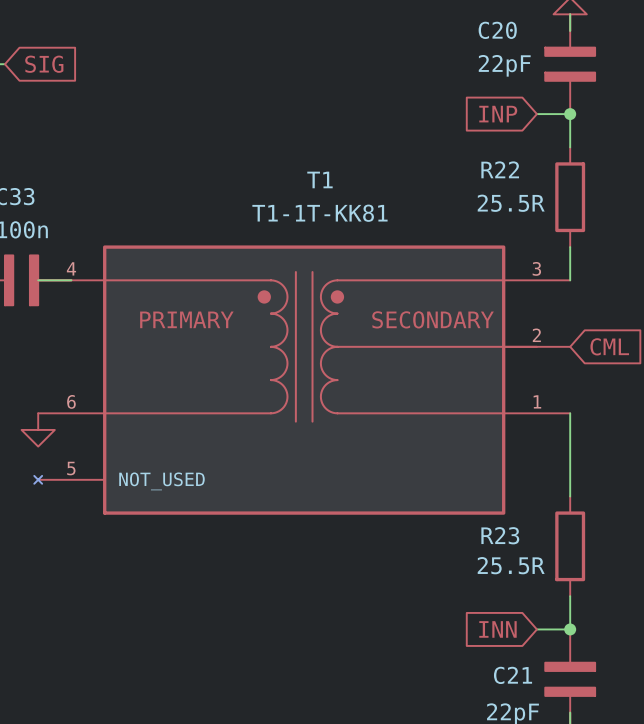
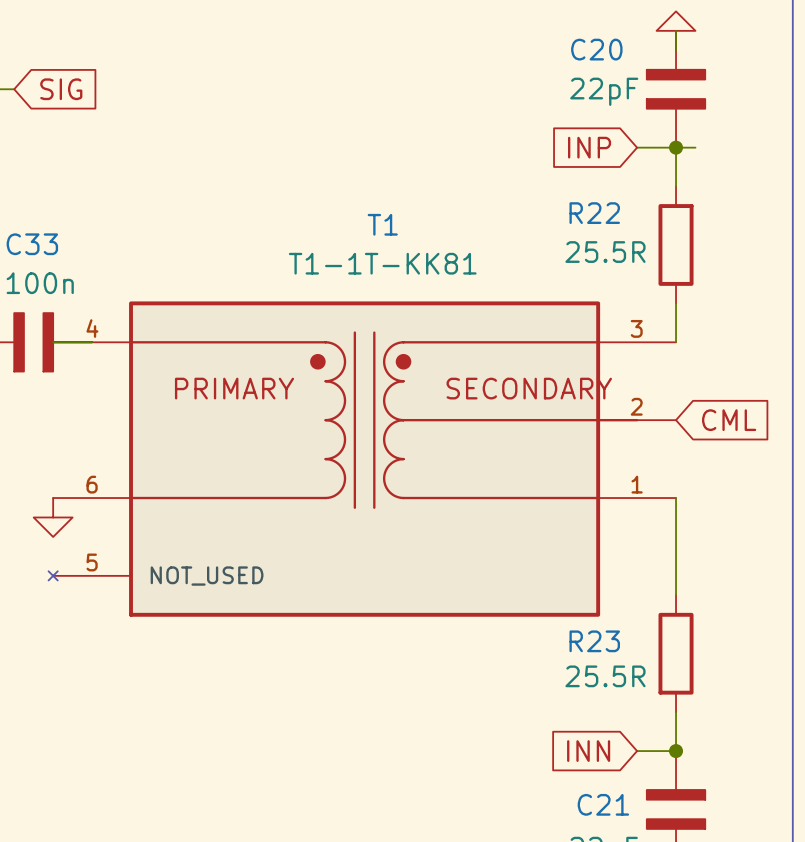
wire: none -> (676, 147) (695, 147)

